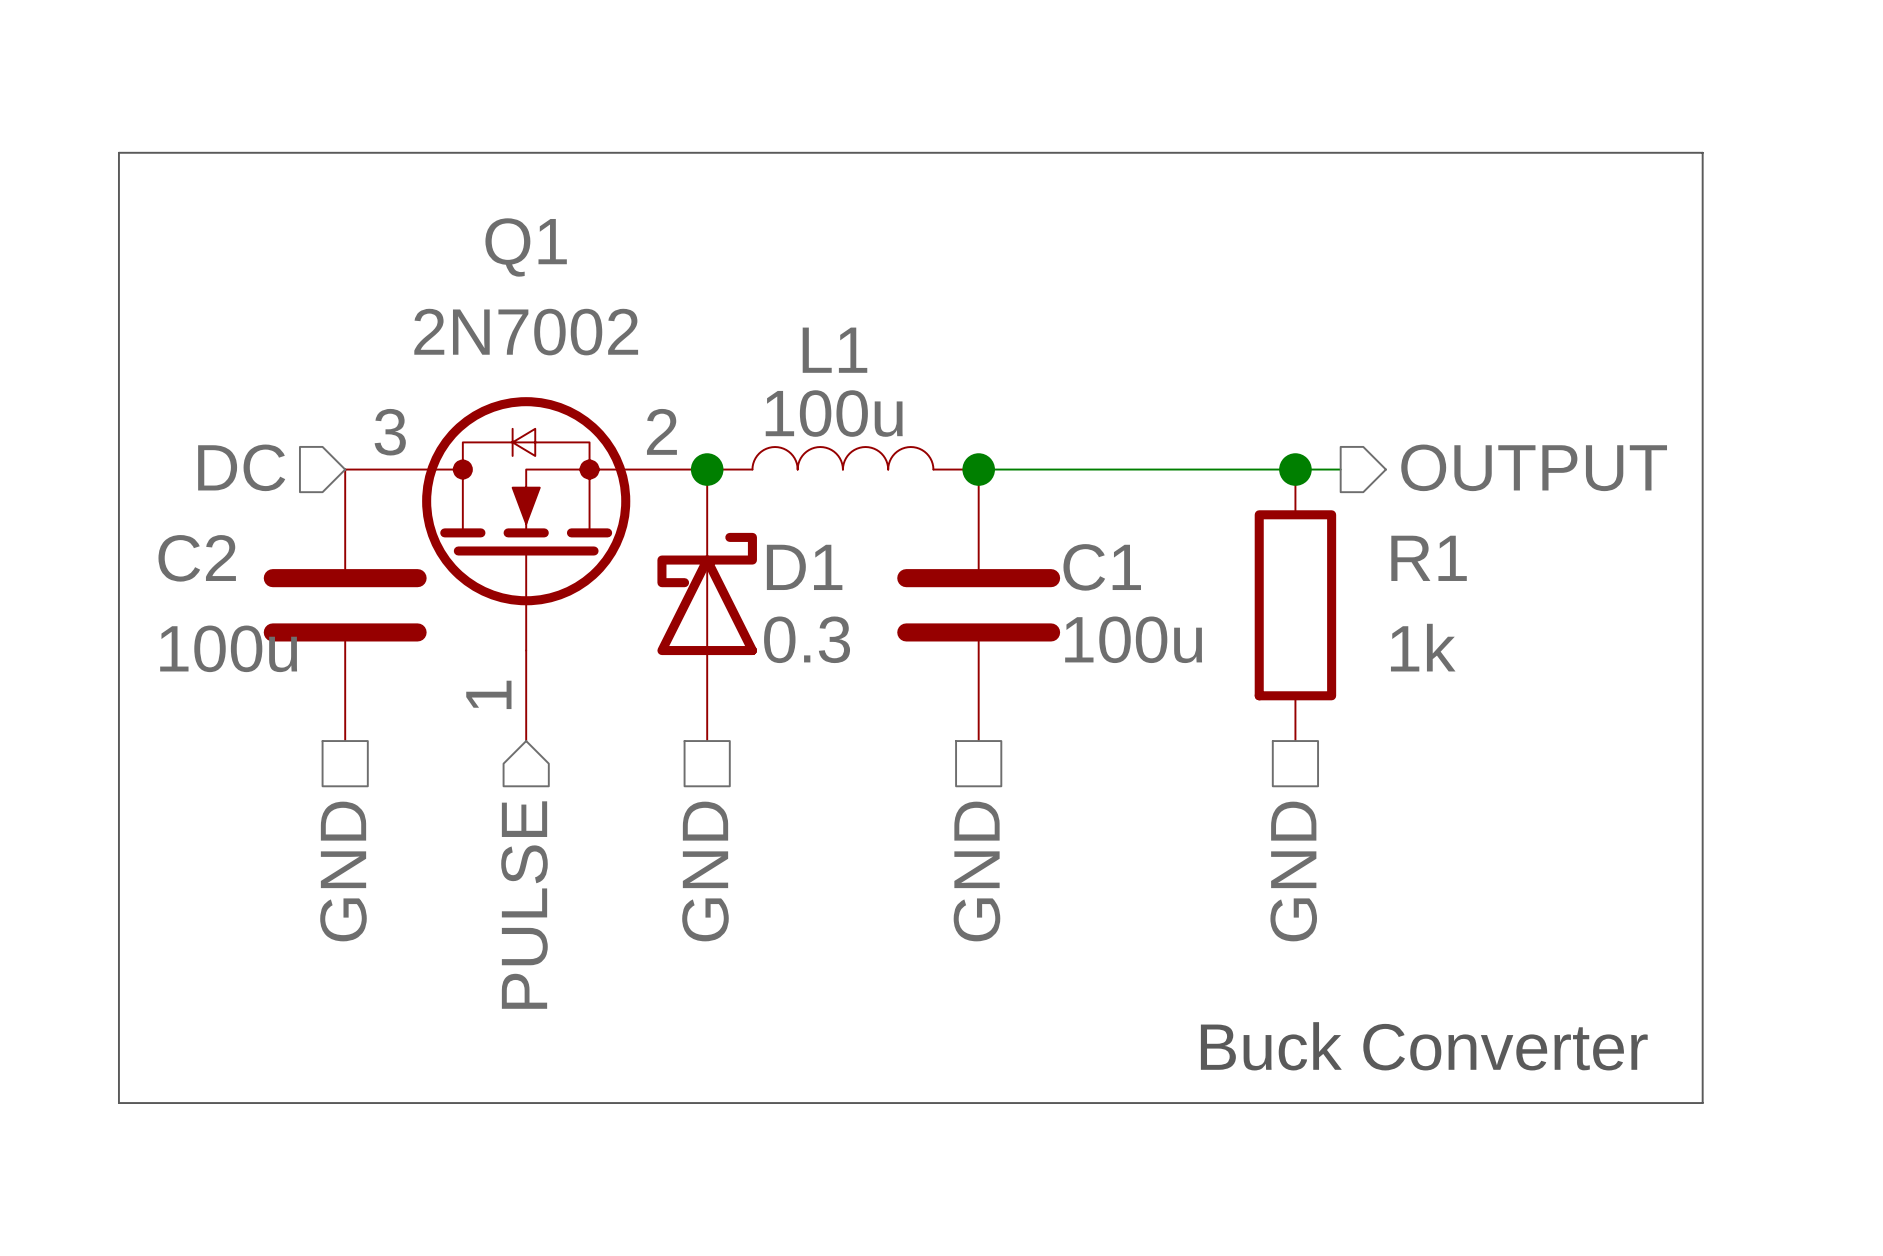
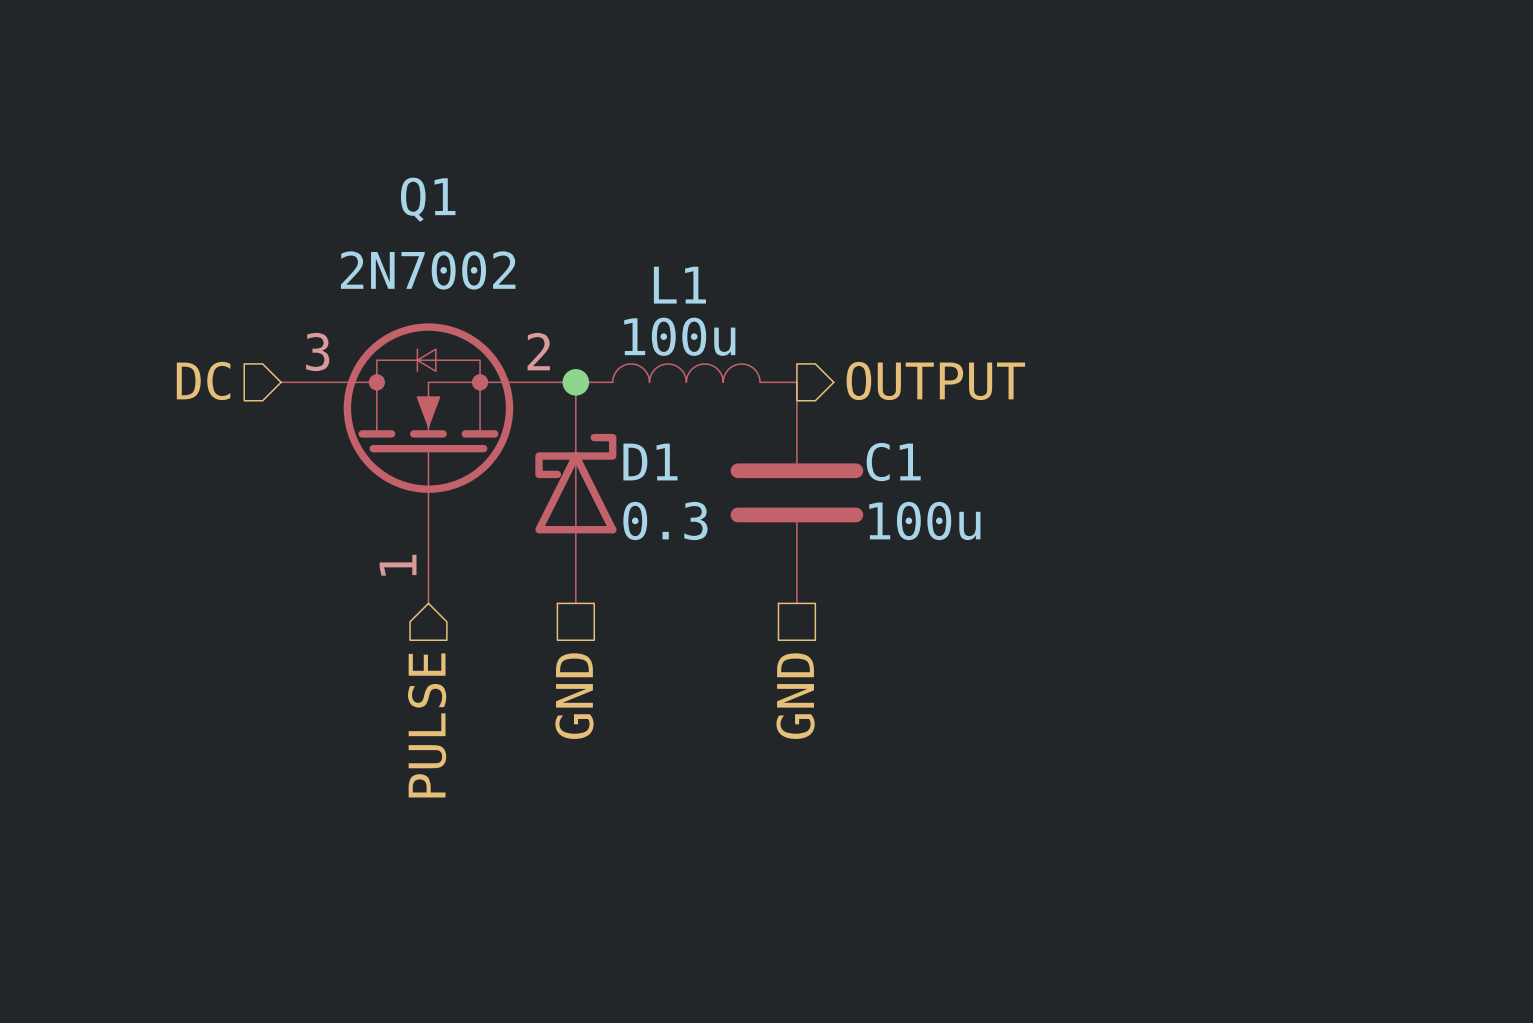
line: (118, 152) (1702, 152) (1702, 1103) (118, 1103) (118, 152) -> none
hierarchical label position: OUTPUT (1534, 467) -> OUTPUT (935, 380)
wire: (978, 469) (1340, 469) -> none
junction: (978, 469) -> none
junction: (1295, 469) -> none
C2: 100u (345, 605) -> none
R1: 1k (1295, 605) -> none
hierarchical label: GND (343, 871) -> none
hierarchical label: GND (1293, 871) -> none
text: Buck Converter (1424, 1046) -> none

